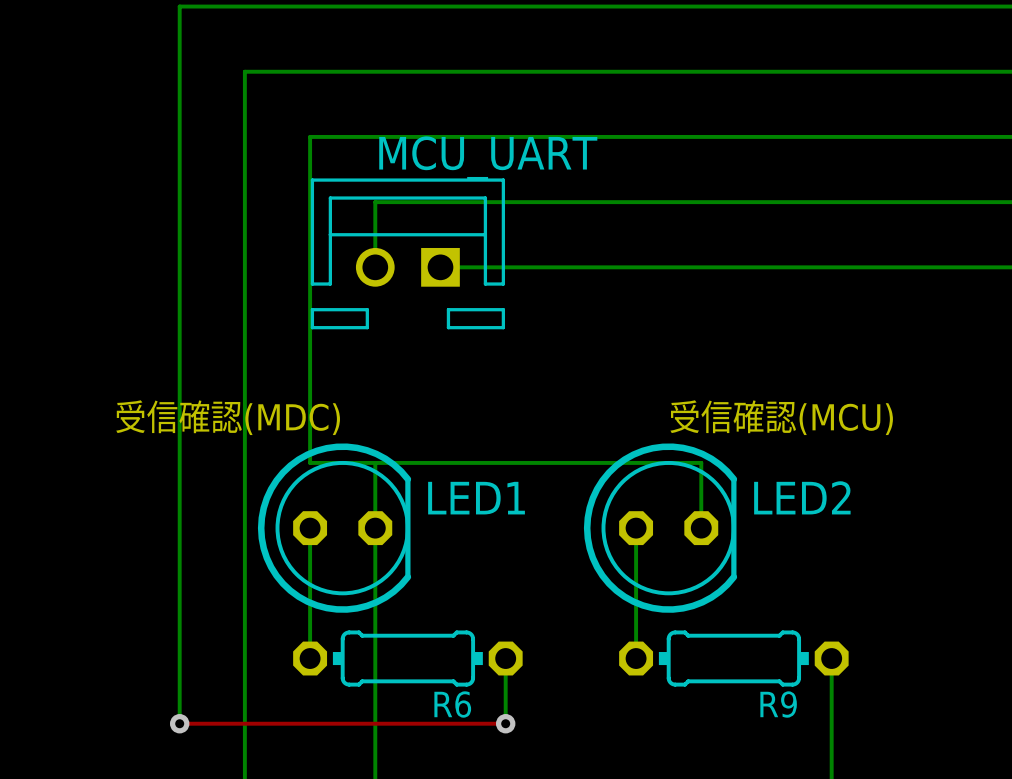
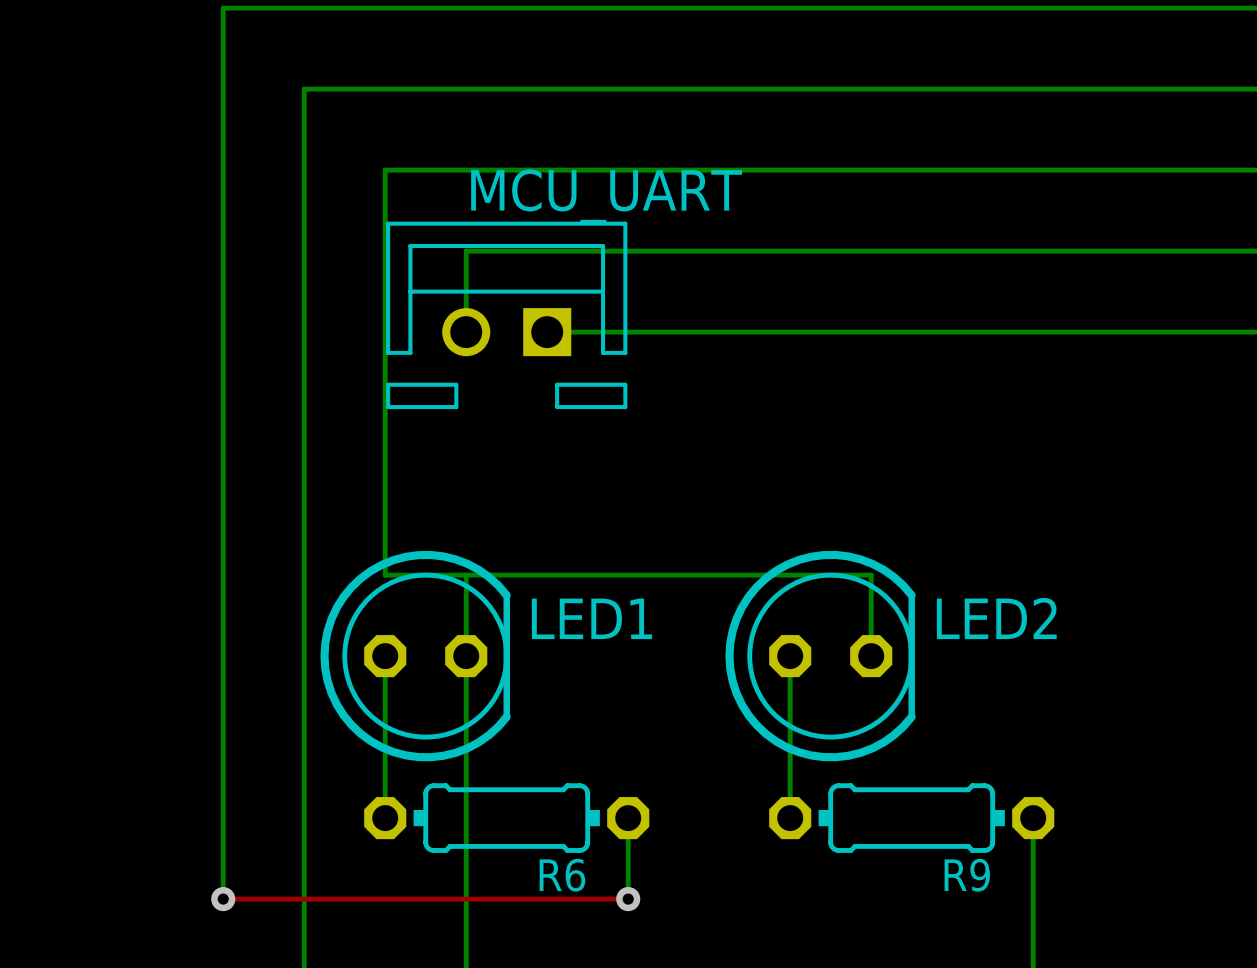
text: 受信確認(MDC) (228, 417) -> none
text: 受信確認(MCU) (781, 417) -> none

